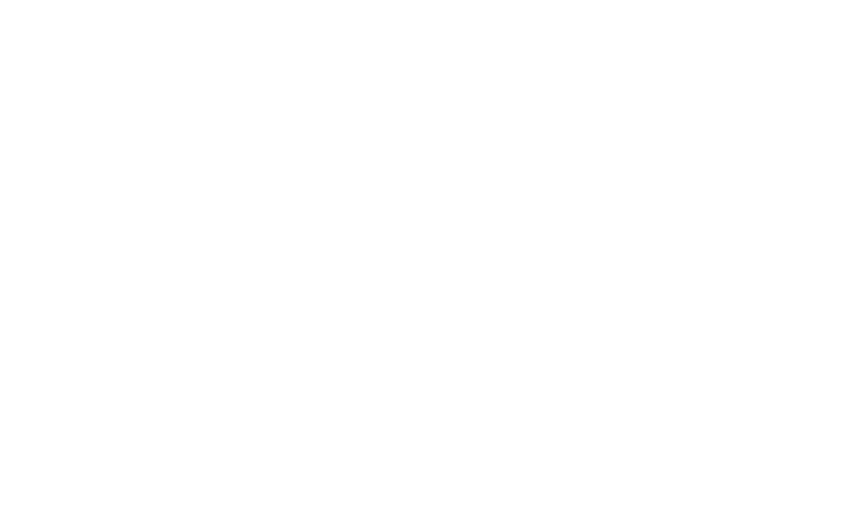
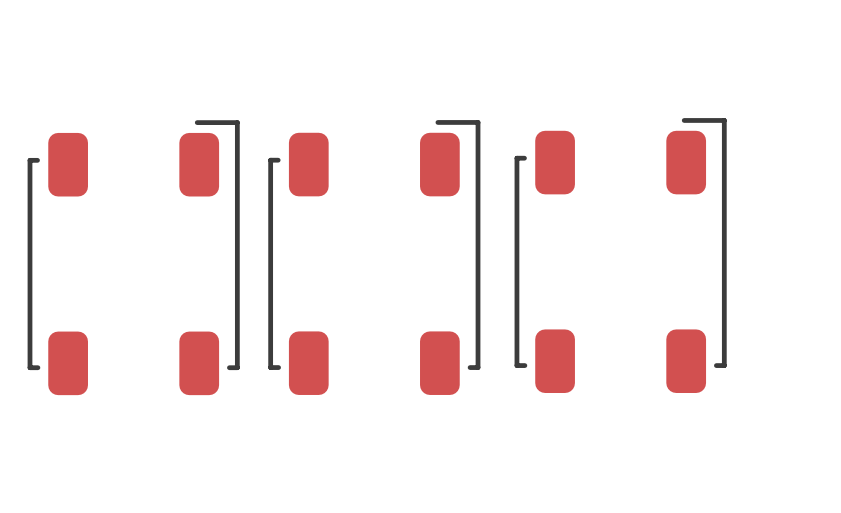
part: none -> (620, 255)
part: none -> (133, 257)
part: none -> (374, 257)

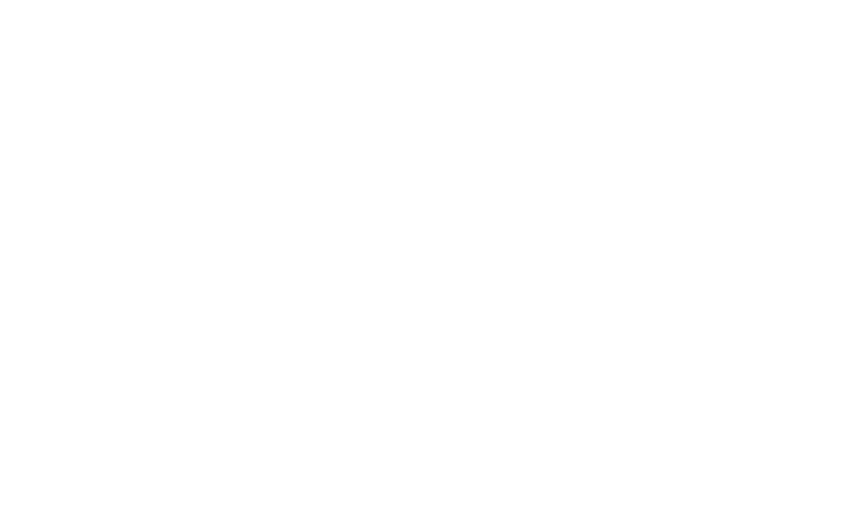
part: (620, 255) -> none
part: (133, 257) -> none
part: (374, 257) -> none

